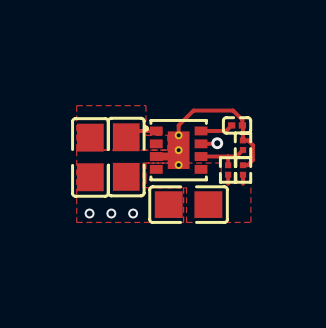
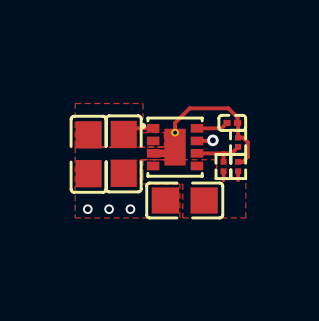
part footprint: [142, 118, 208, 182] -> [140, 116, 204, 178]

